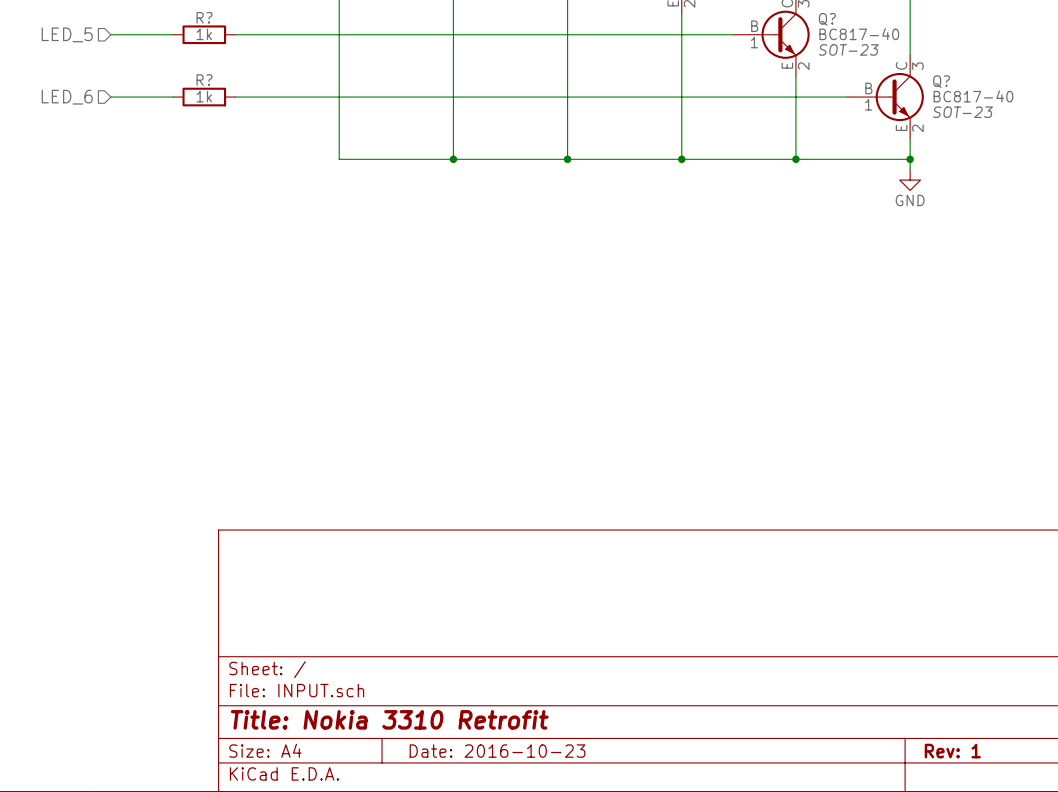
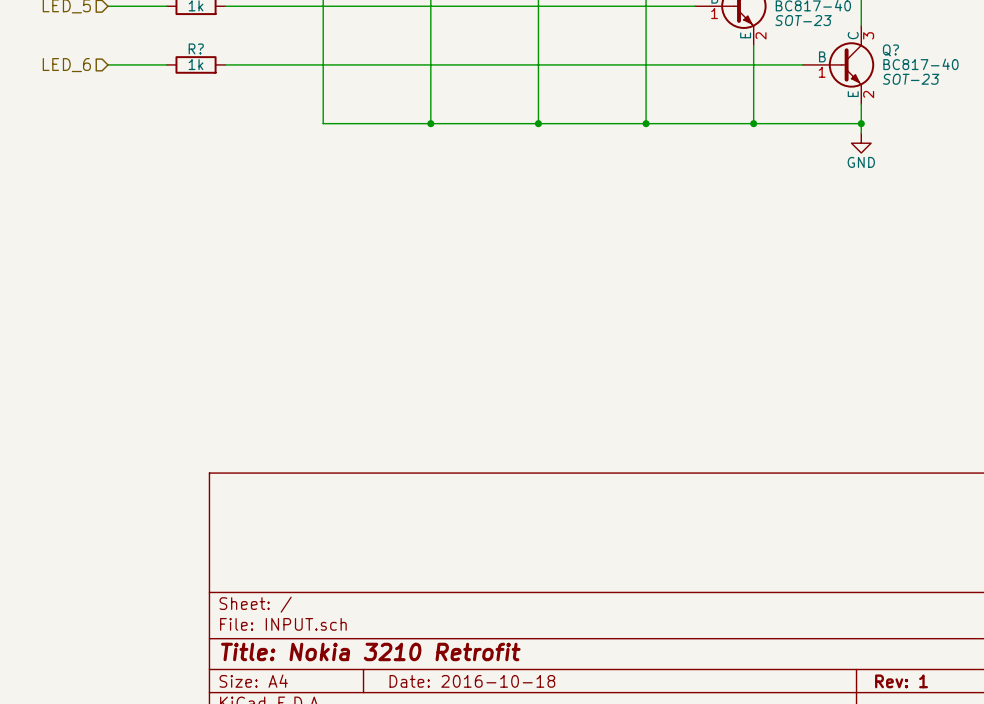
title block: Title: Nokia 3310 Retrofit (389, 719) -> Title: Nokia 3210 Retrofit (370, 651)
title block: Date: 2016-10-23 (497, 751) -> Date: 2016-10-18 (472, 681)

